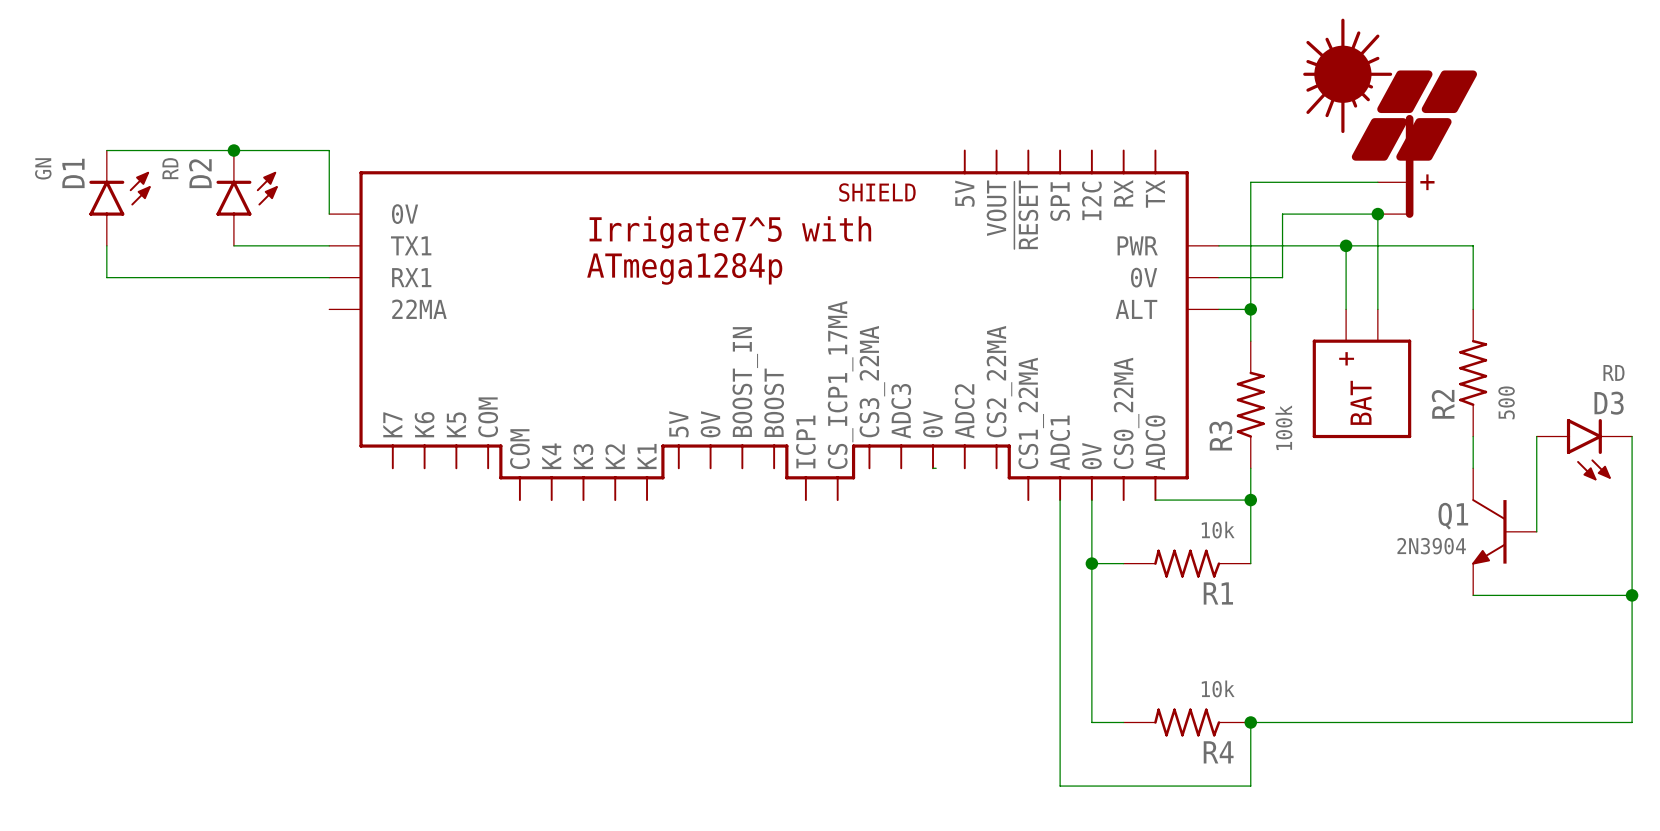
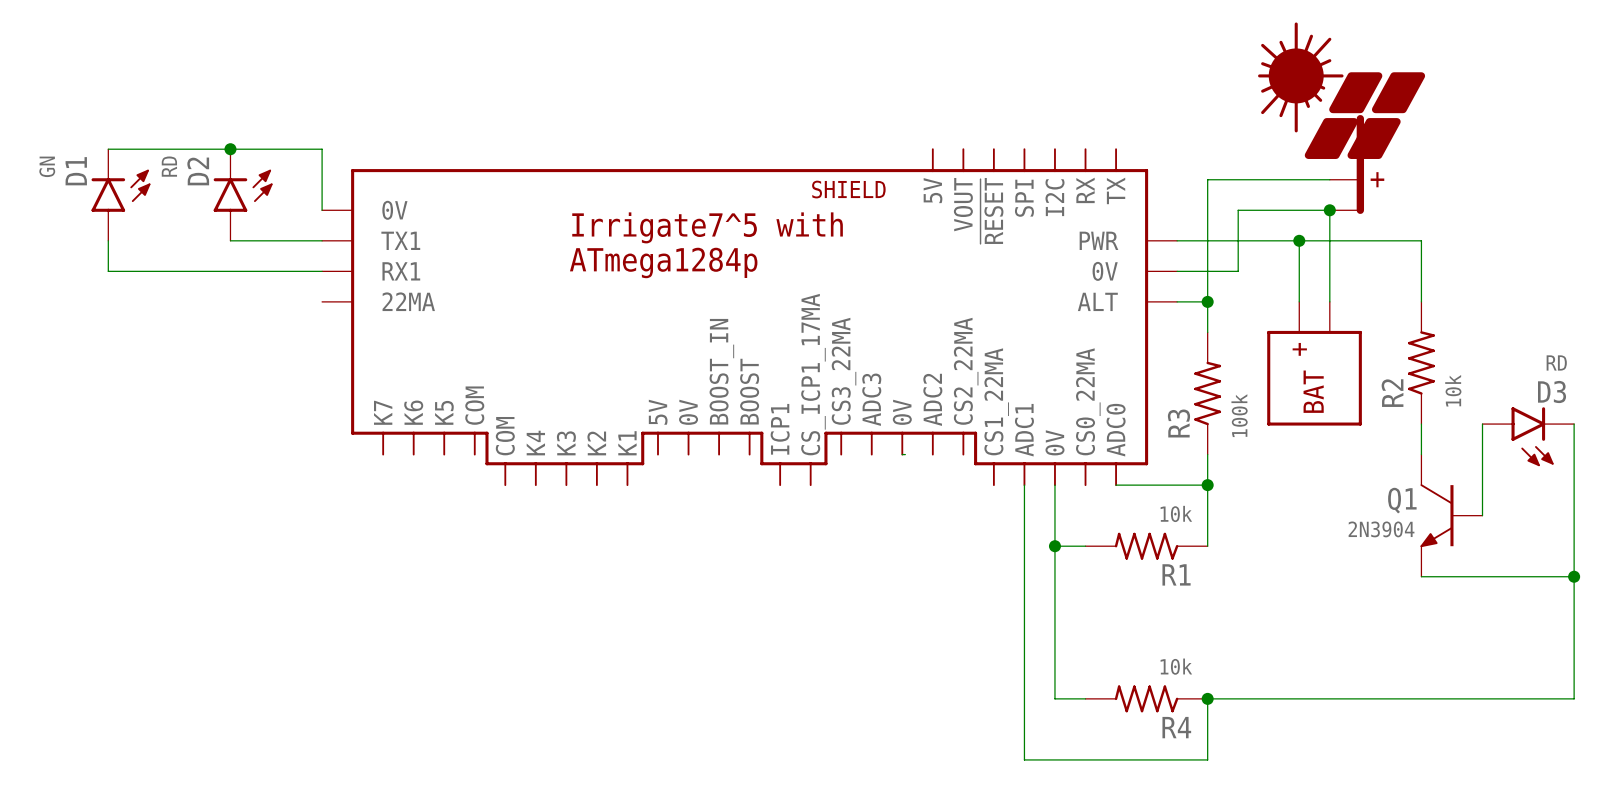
R2 value: 500 (1506, 402) -> 10k (1453, 390)

